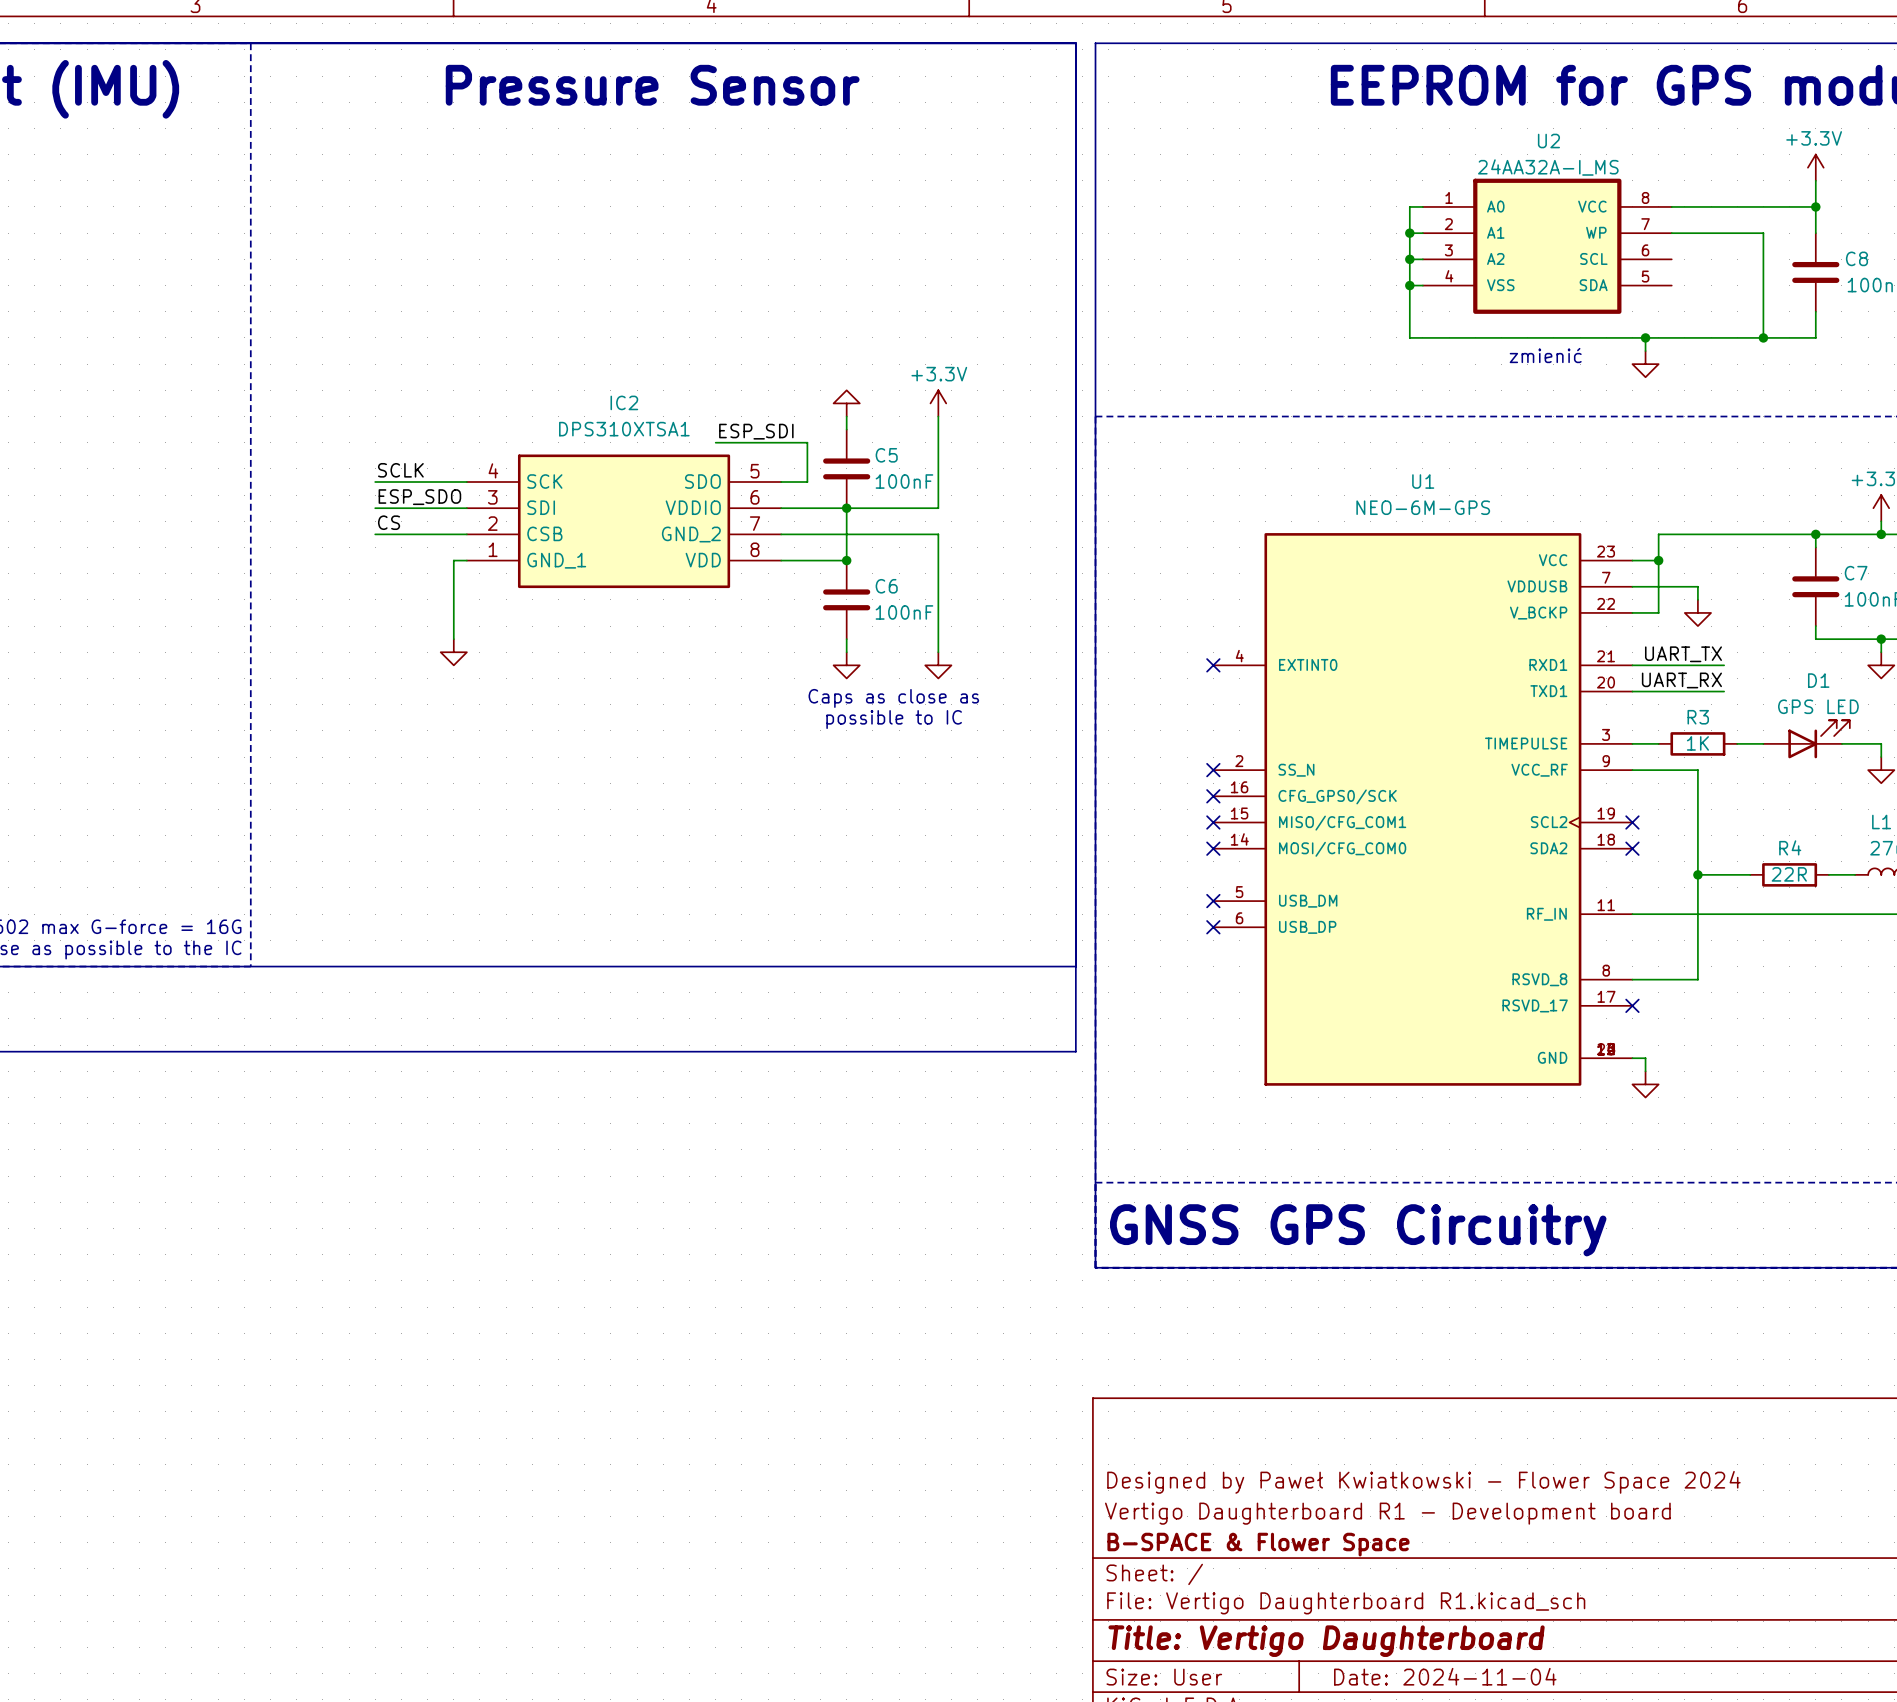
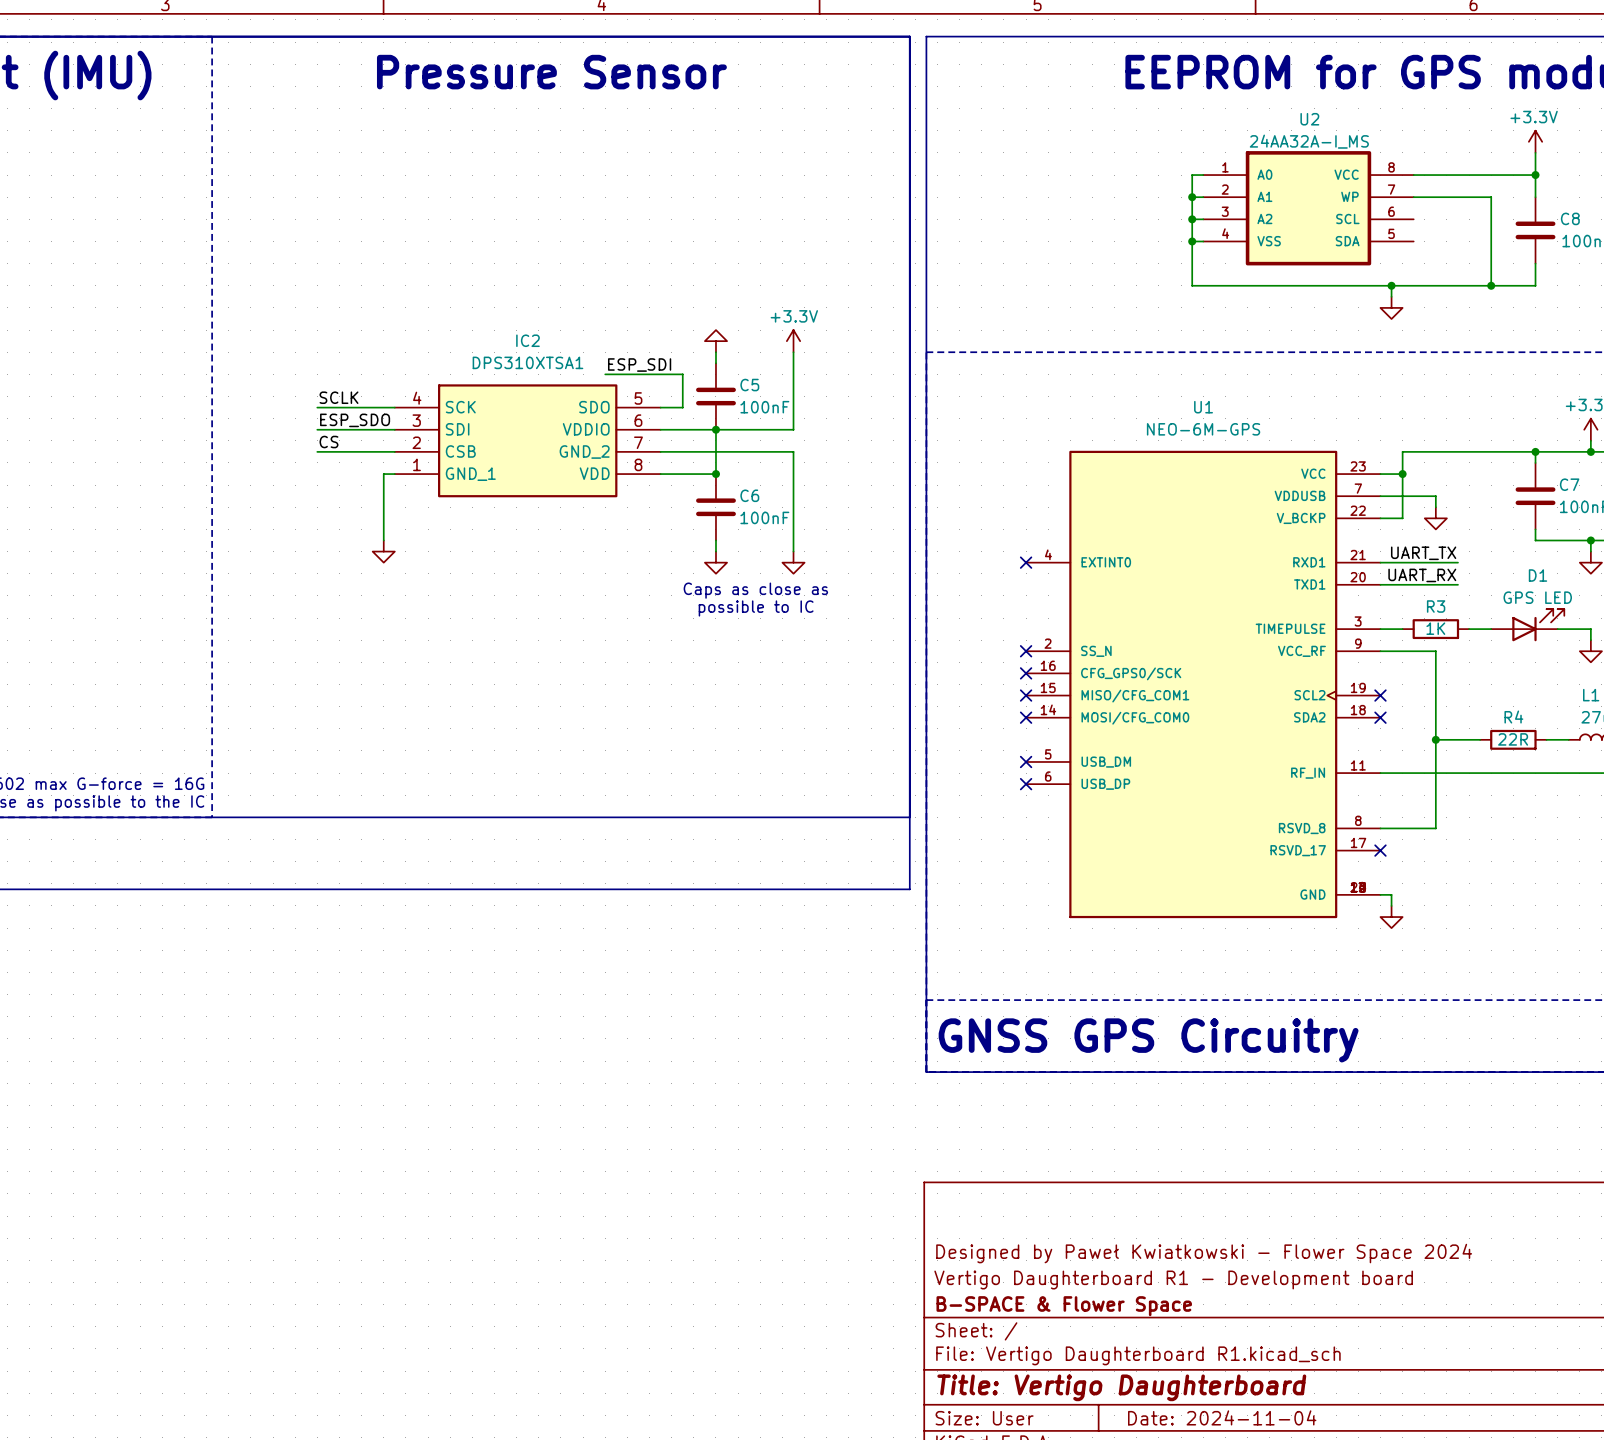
text: zmienić (1545, 355) -> none

